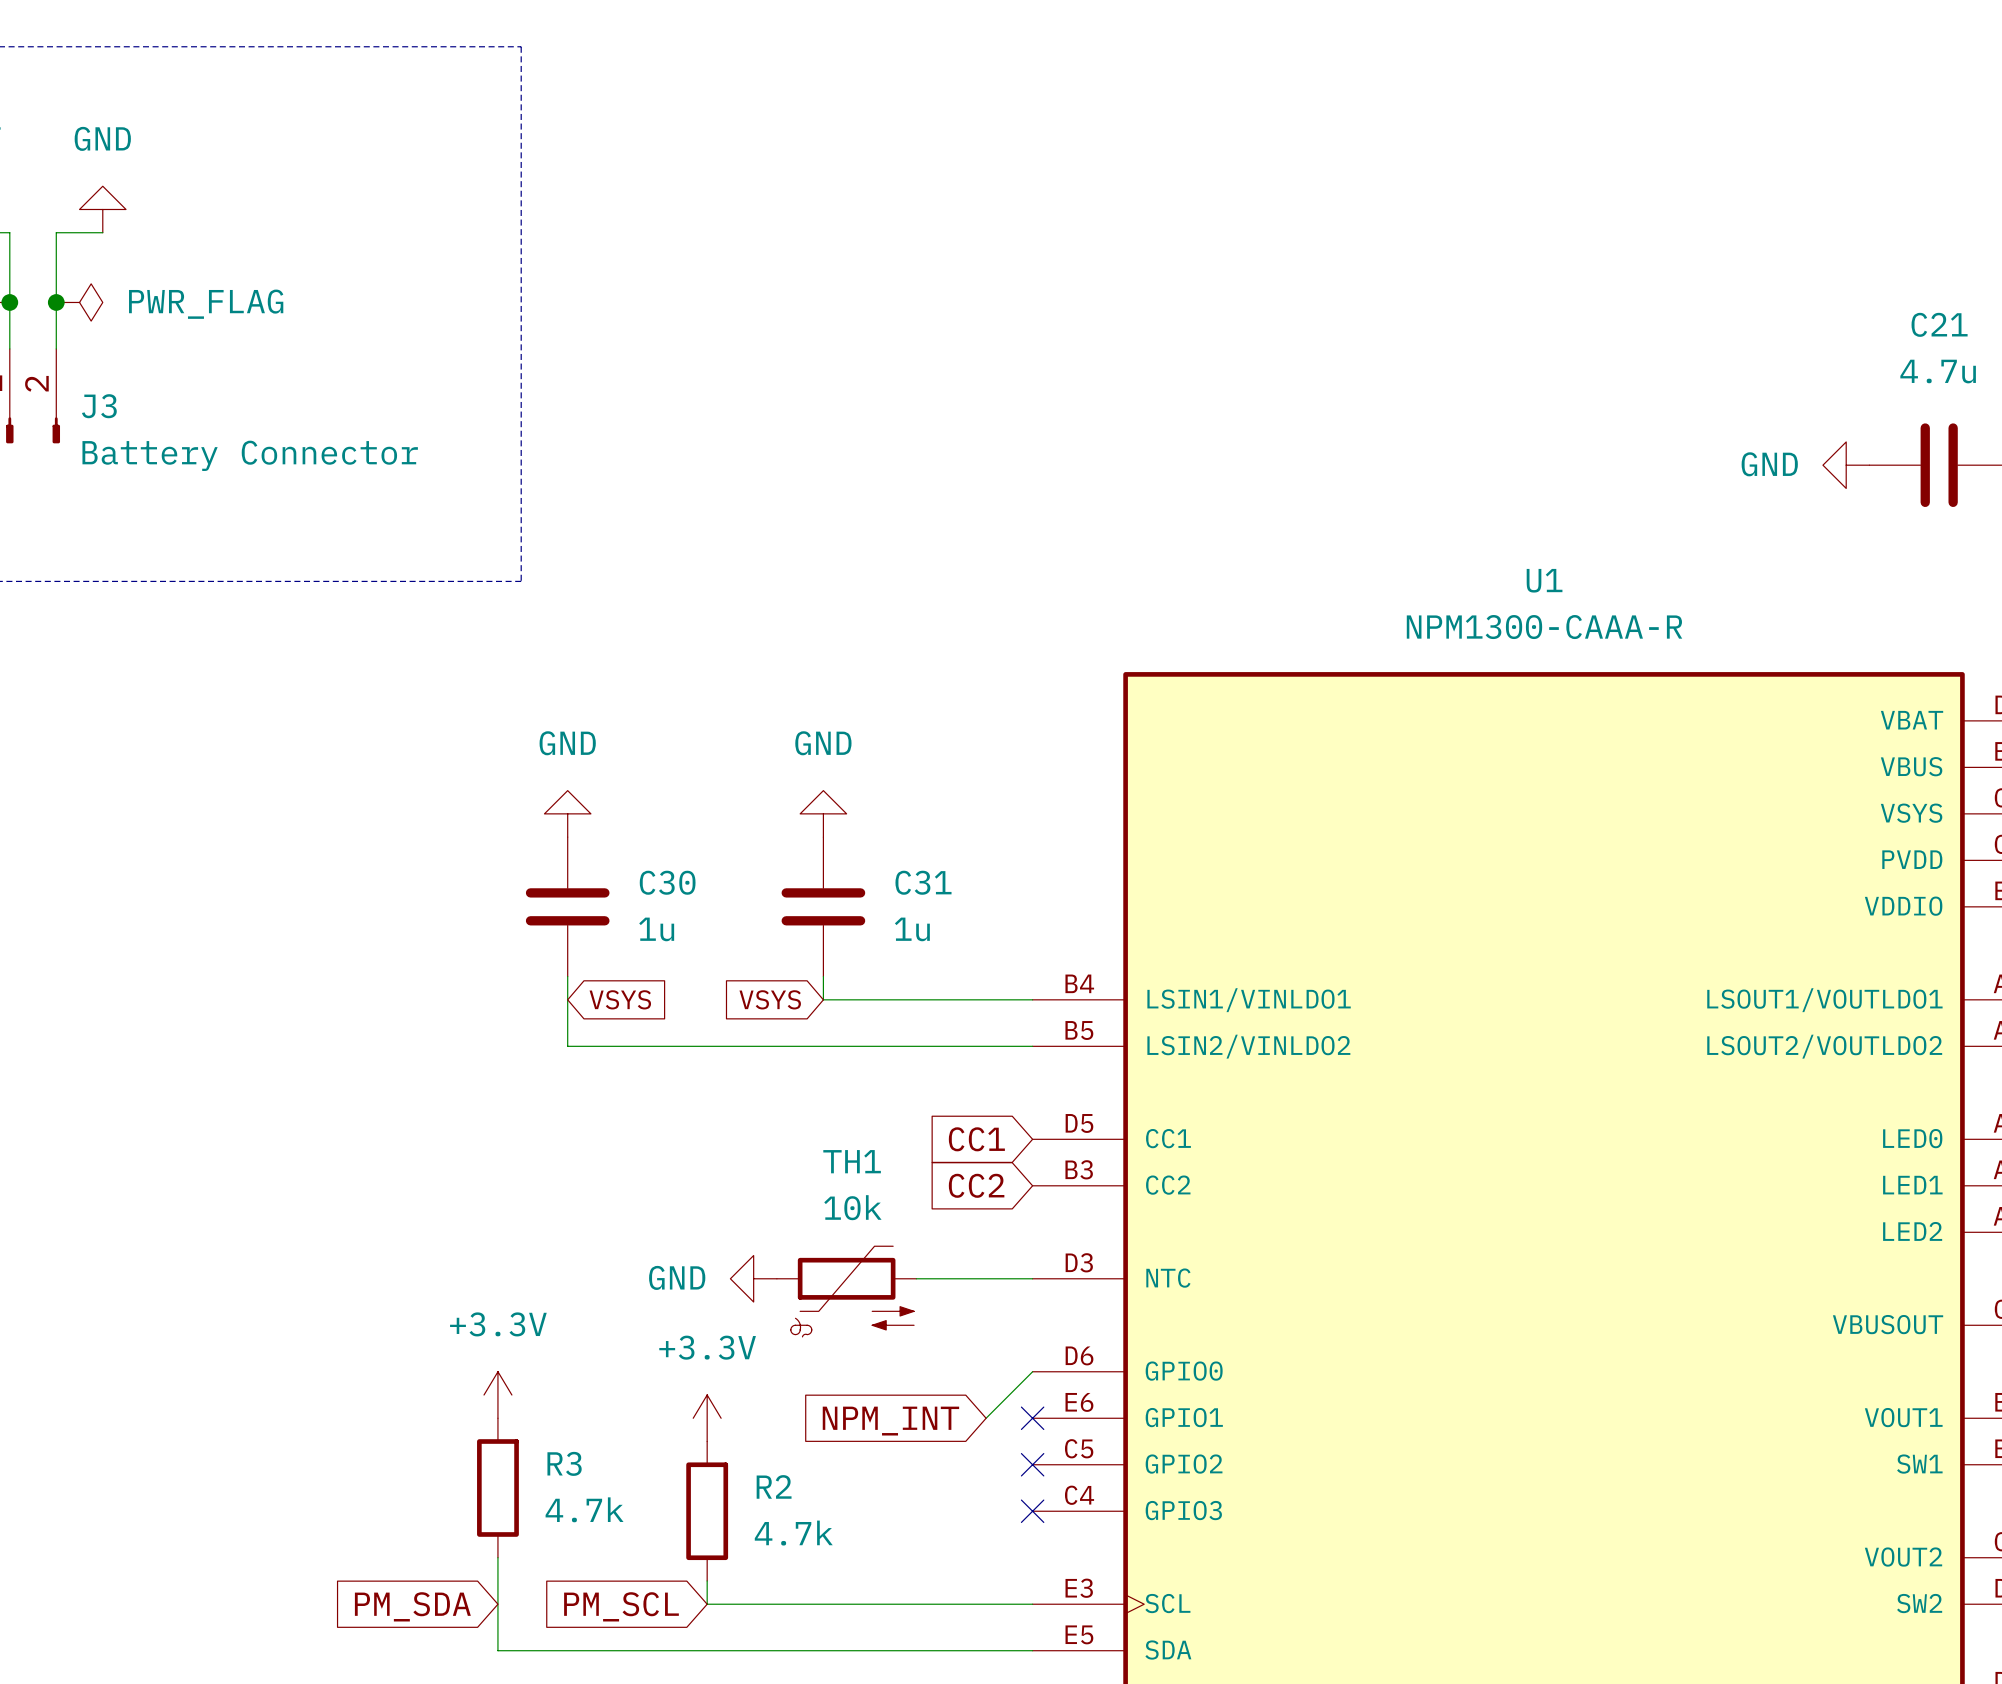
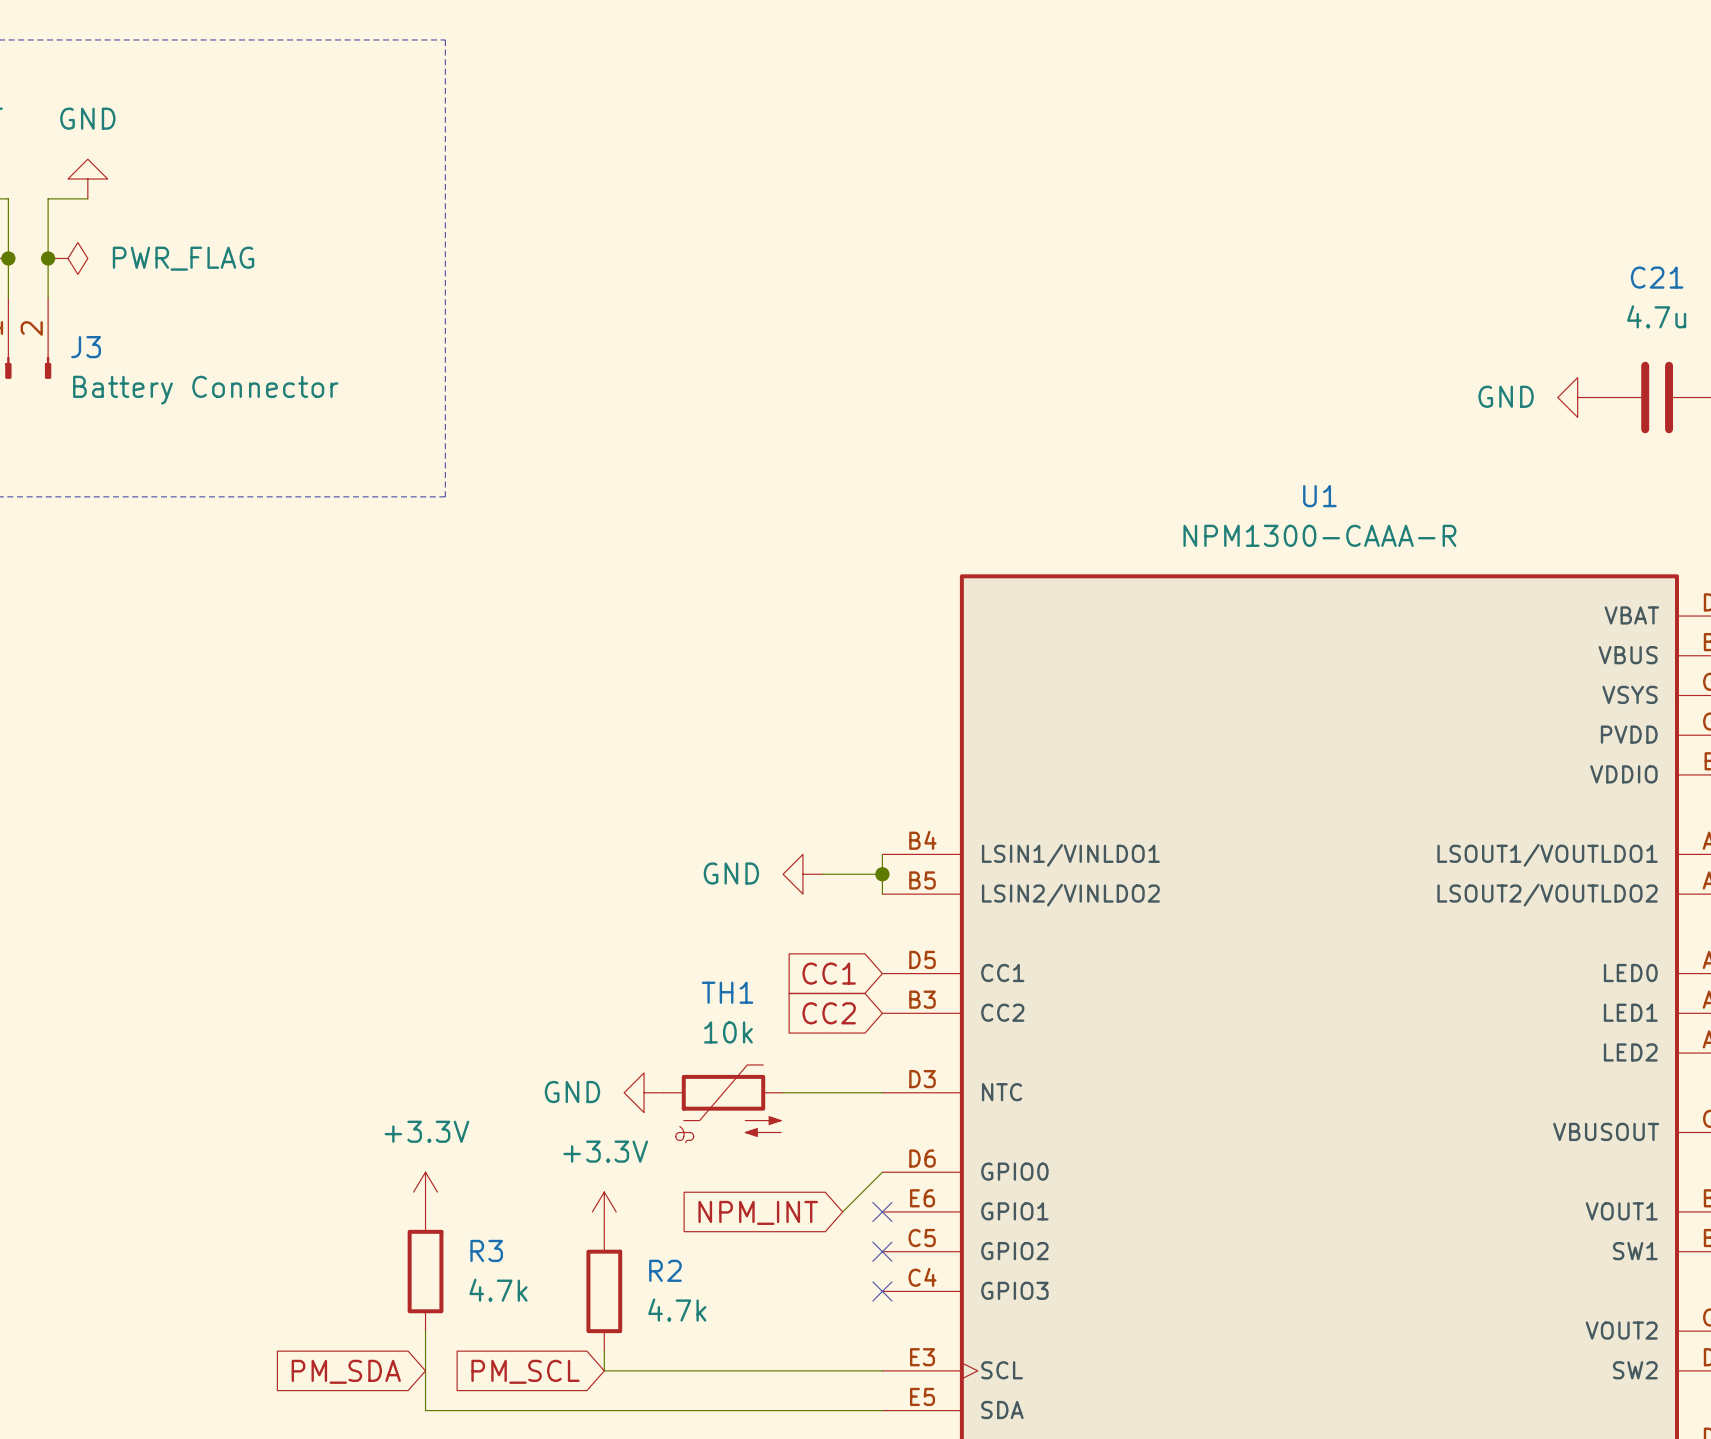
power symbol: GND (567, 813) -> none
power symbol: GND (823, 813) -> none
C30: 1u (567, 906) -> none
C31: 1u (823, 906) -> none
wire: (567, 976) (567, 1046) (1032, 1046) -> none
wire: (823, 976) (823, 999) (1032, 999) -> (882, 894) (882, 854)
global label: VSYS (620, 999) -> none
global label: VSYS (770, 999) -> none
power symbol: none -> GND (802, 874)
wire: none -> (822, 874) (882, 874)
junction: none -> (882, 874)

